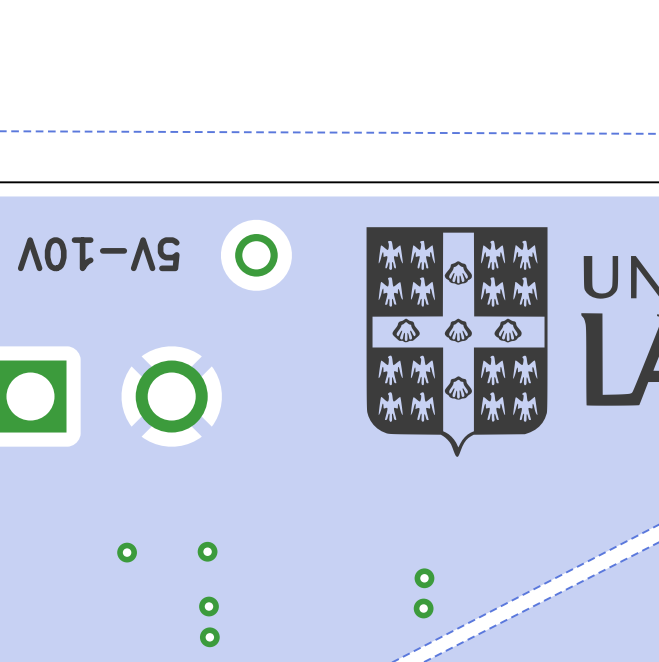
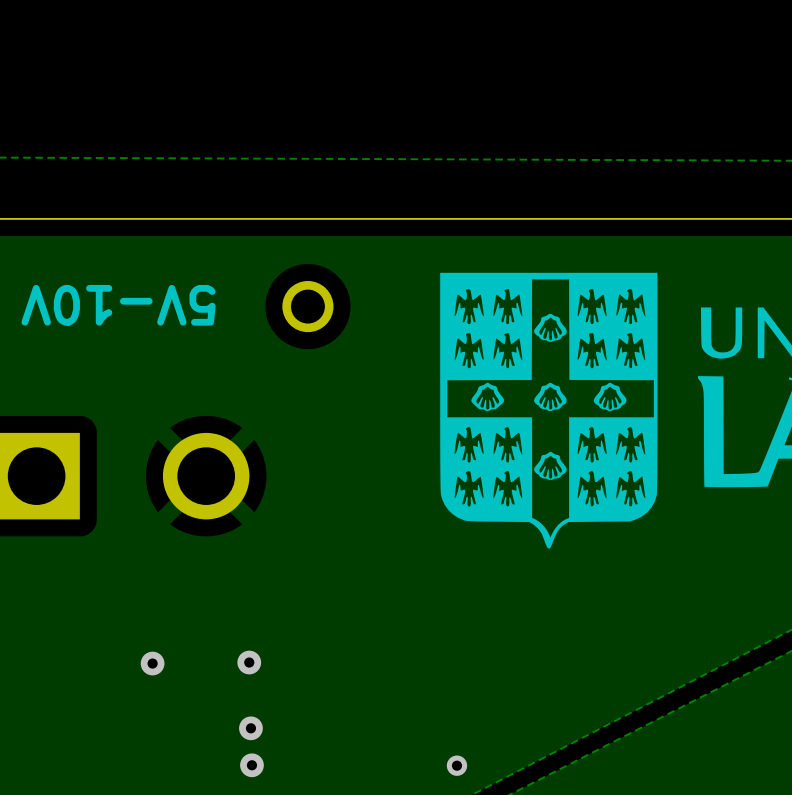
via: (424, 578) -> none
via: (423, 608) -> none
via: none -> (456, 765)

